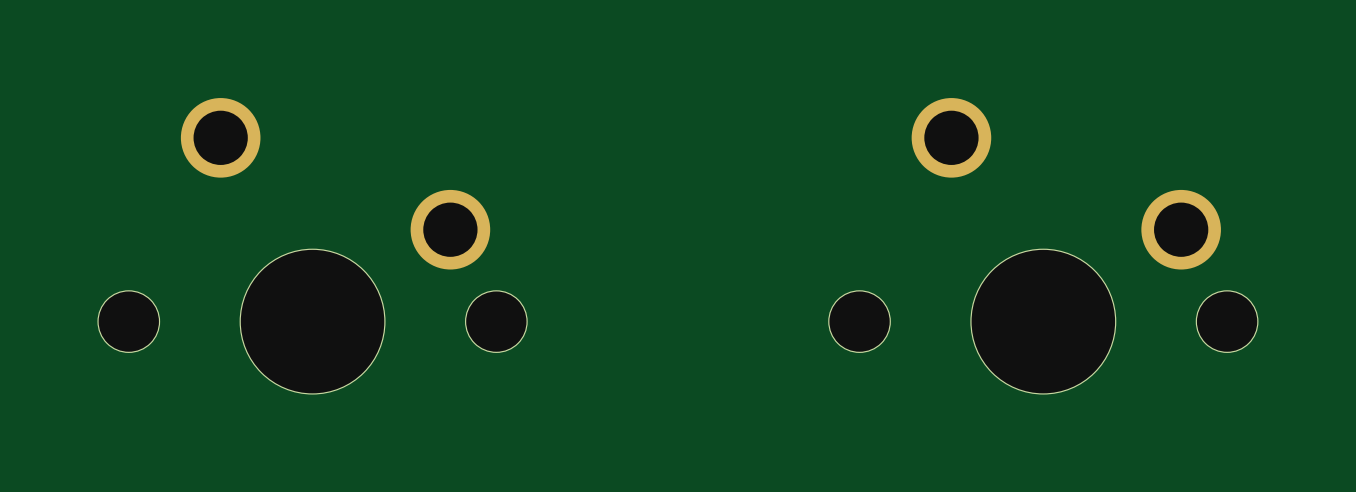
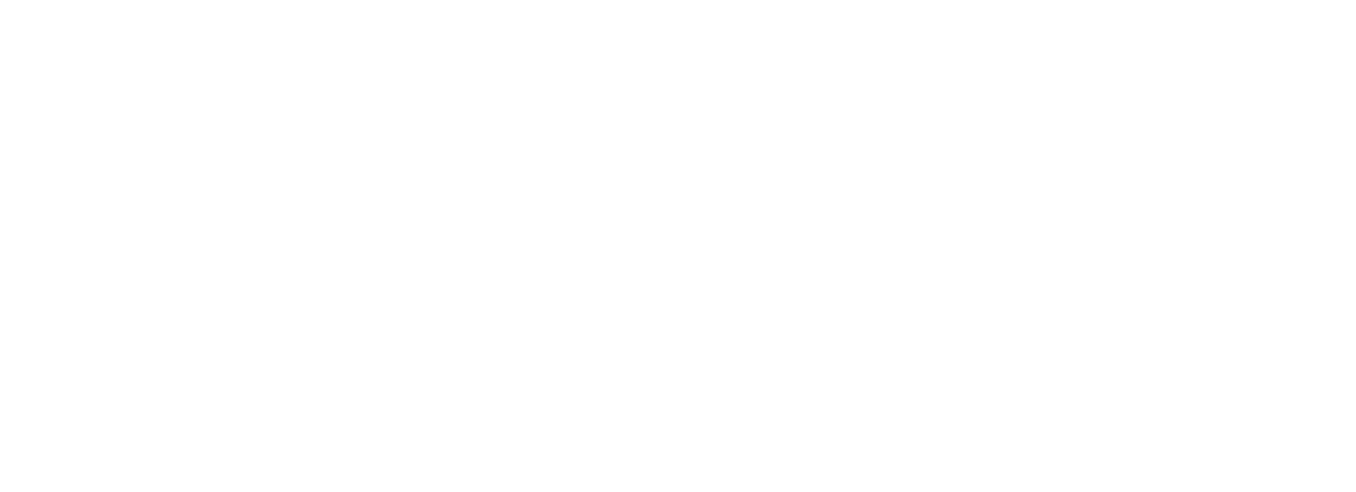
part: (312, 246) -> none
part: (1043, 246) -> none

